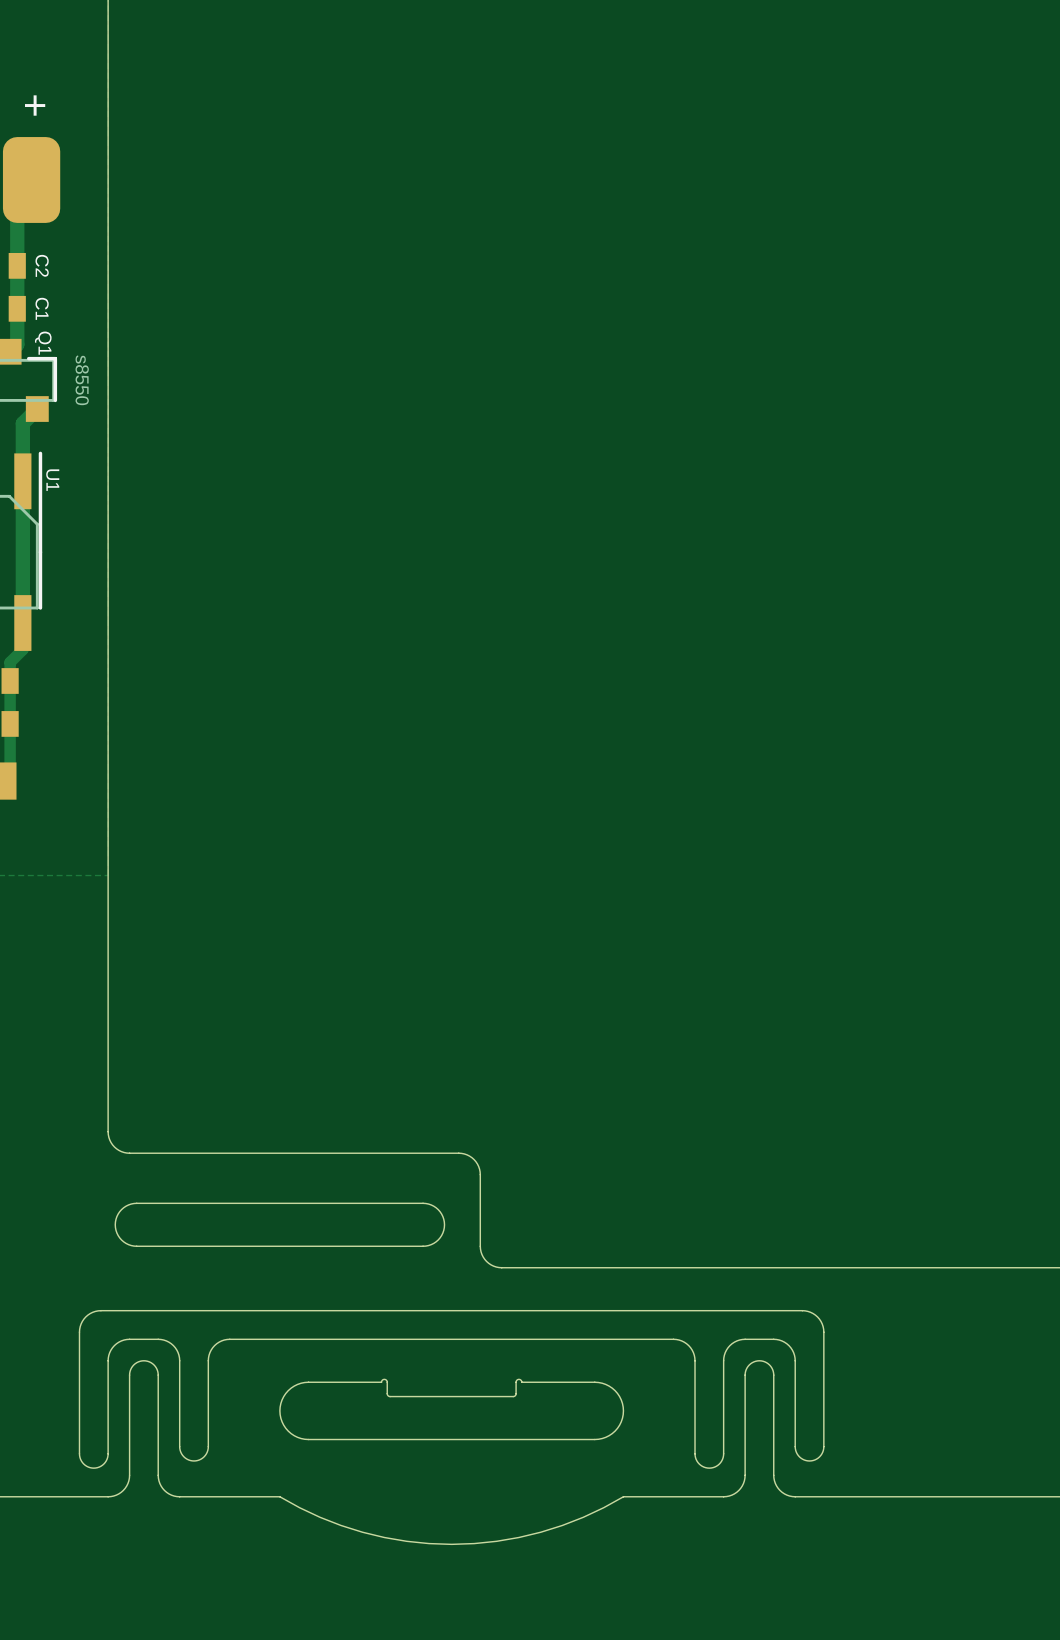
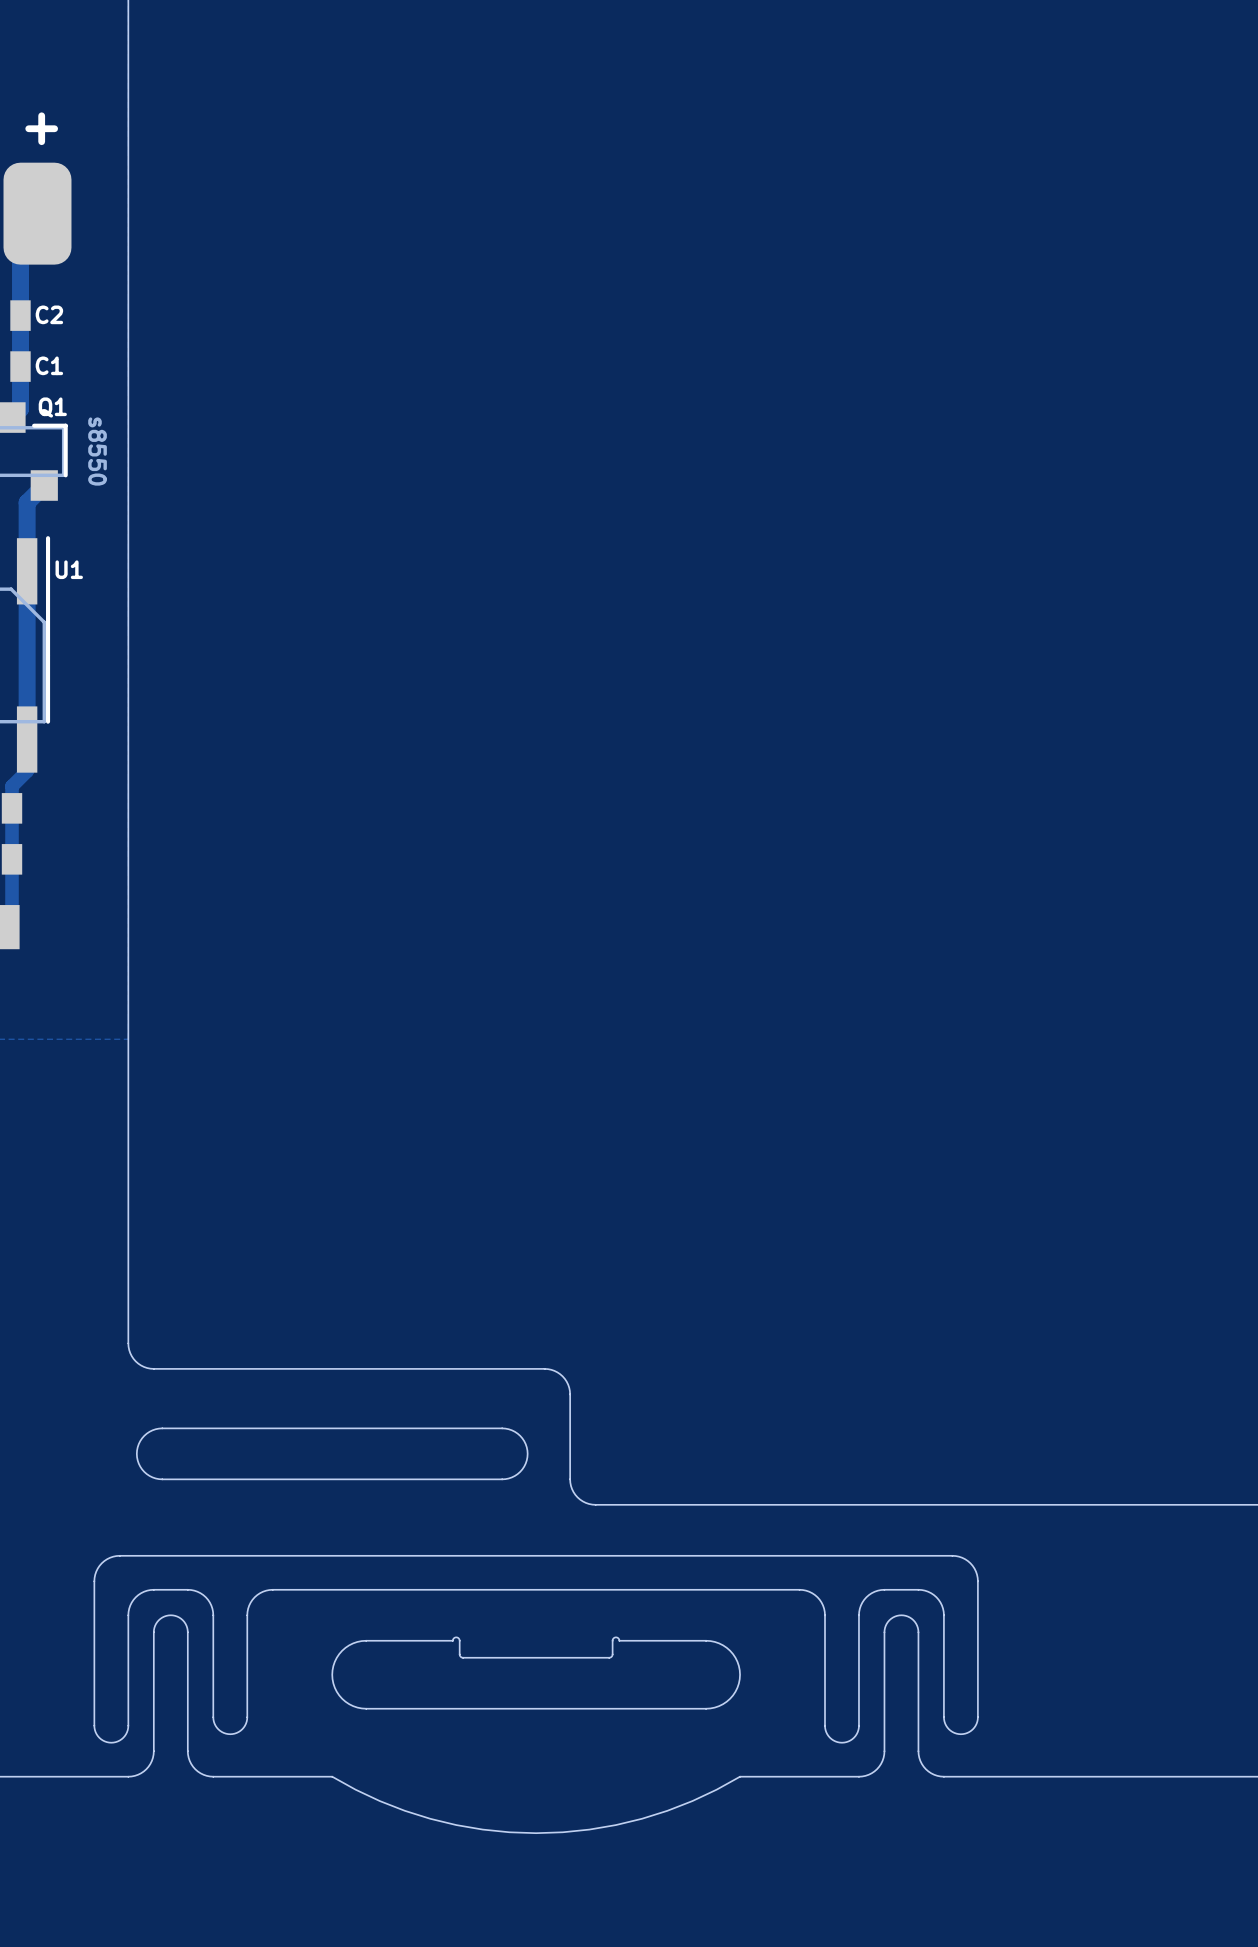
C2 name rotation: 0° (42, 265) -> 90° counterclockwise (49, 314)
C1 name rotation: 0° (42, 308) -> 90° counterclockwise (49, 365)
Q1 name rotation: 0° (43, 343) -> 90° counterclockwise (52, 407)
U1 name rotation: 0° (52, 480) -> 90° counterclockwise (69, 569)

